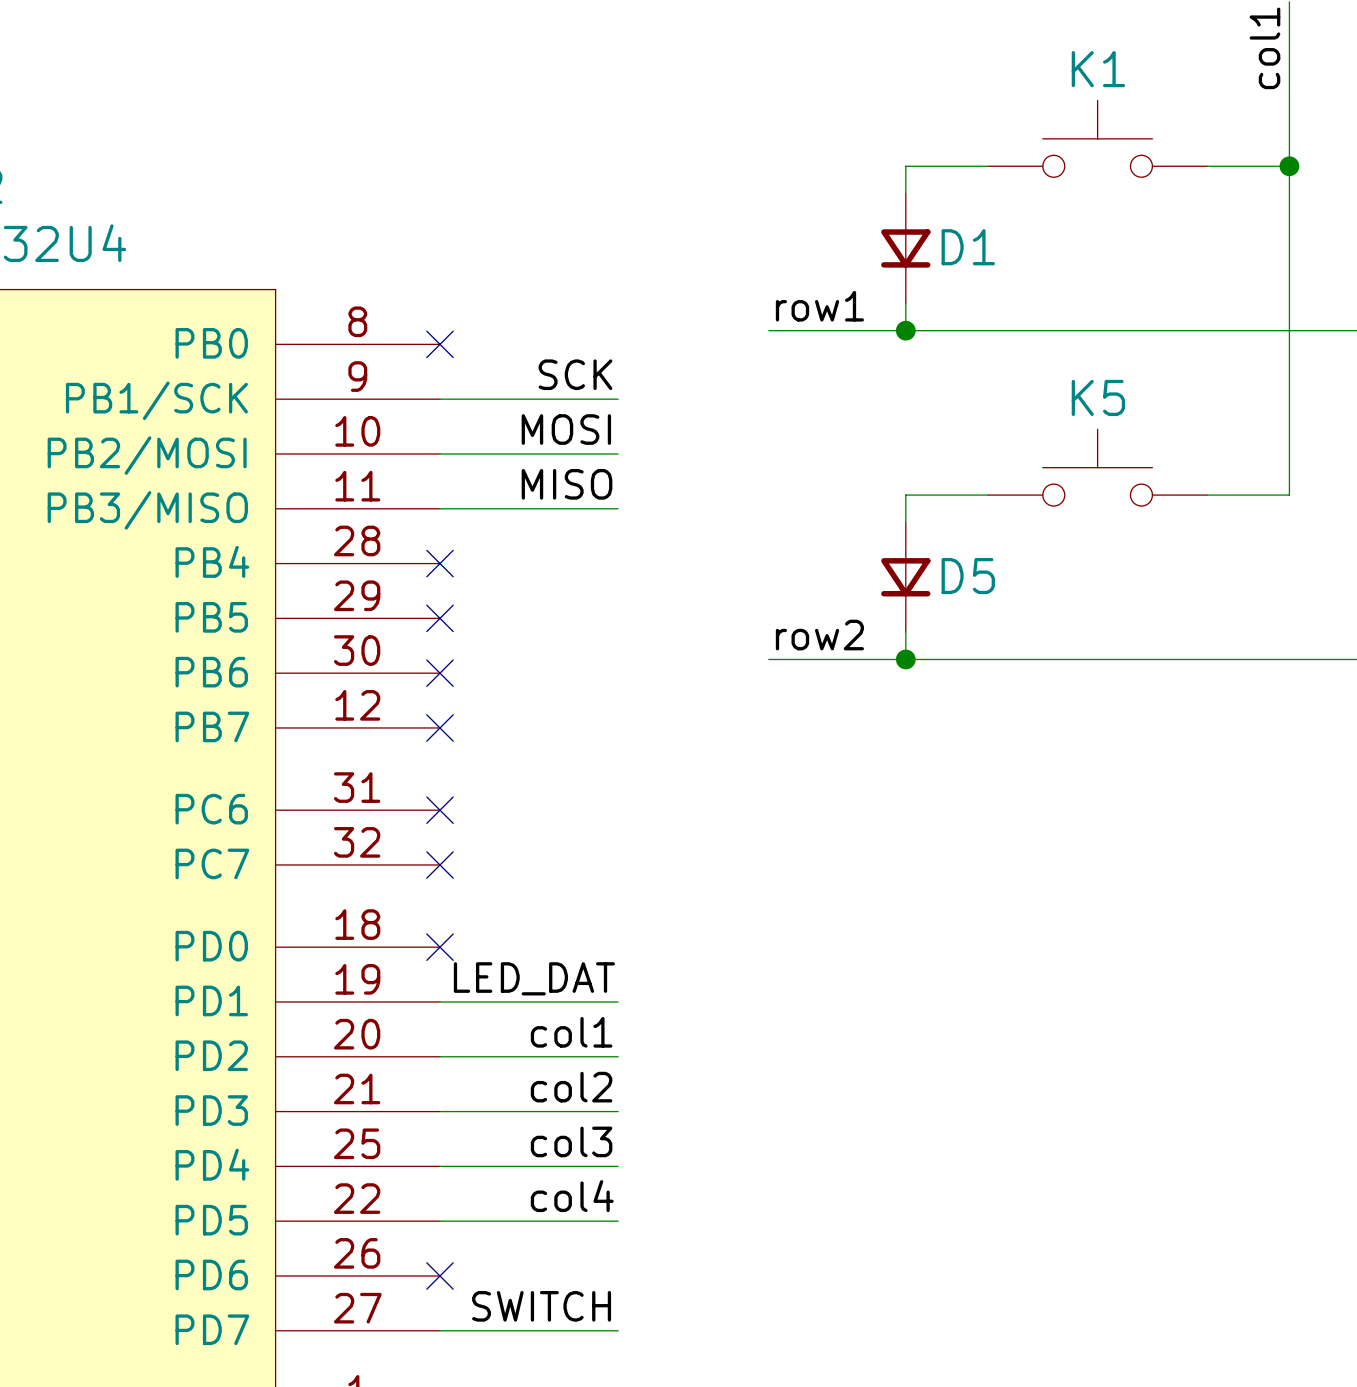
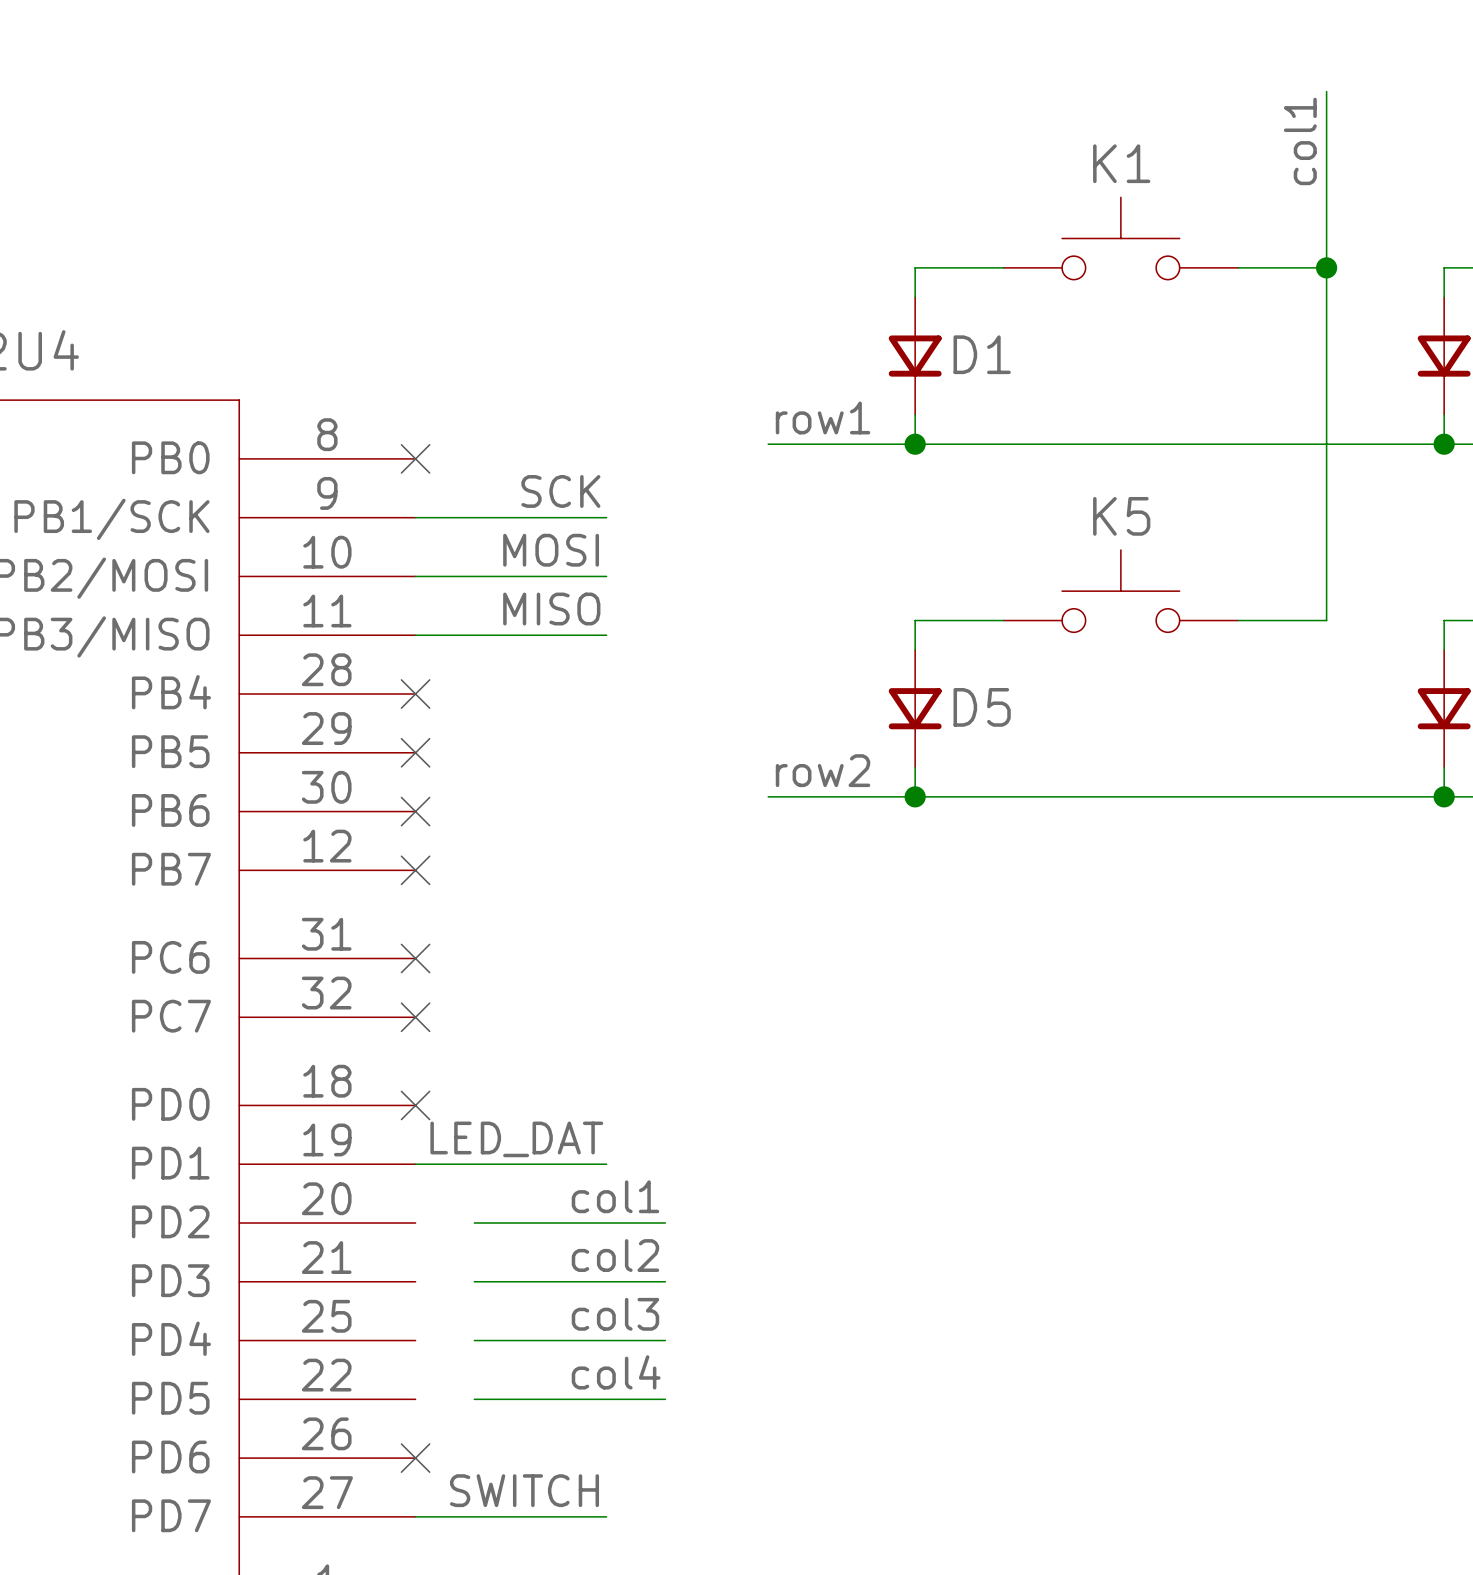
label position: col1 (571, 1032) -> col1 (615, 1196)
wire: (440, 1056) (494, 1056) -> (606, 1222) (665, 1222)
label position: col2 (571, 1087) -> col2 (615, 1255)
wire: (440, 1111) (494, 1111) -> (606, 1281) (665, 1281)
label position: col3 (571, 1141) -> col3 (615, 1314)
wire: (440, 1166) (494, 1166) -> (606, 1340) (665, 1340)
label position: col4 (572, 1196) -> col4 (616, 1372)
wire: (440, 1221) (494, 1221) -> (606, 1399) (665, 1399)

